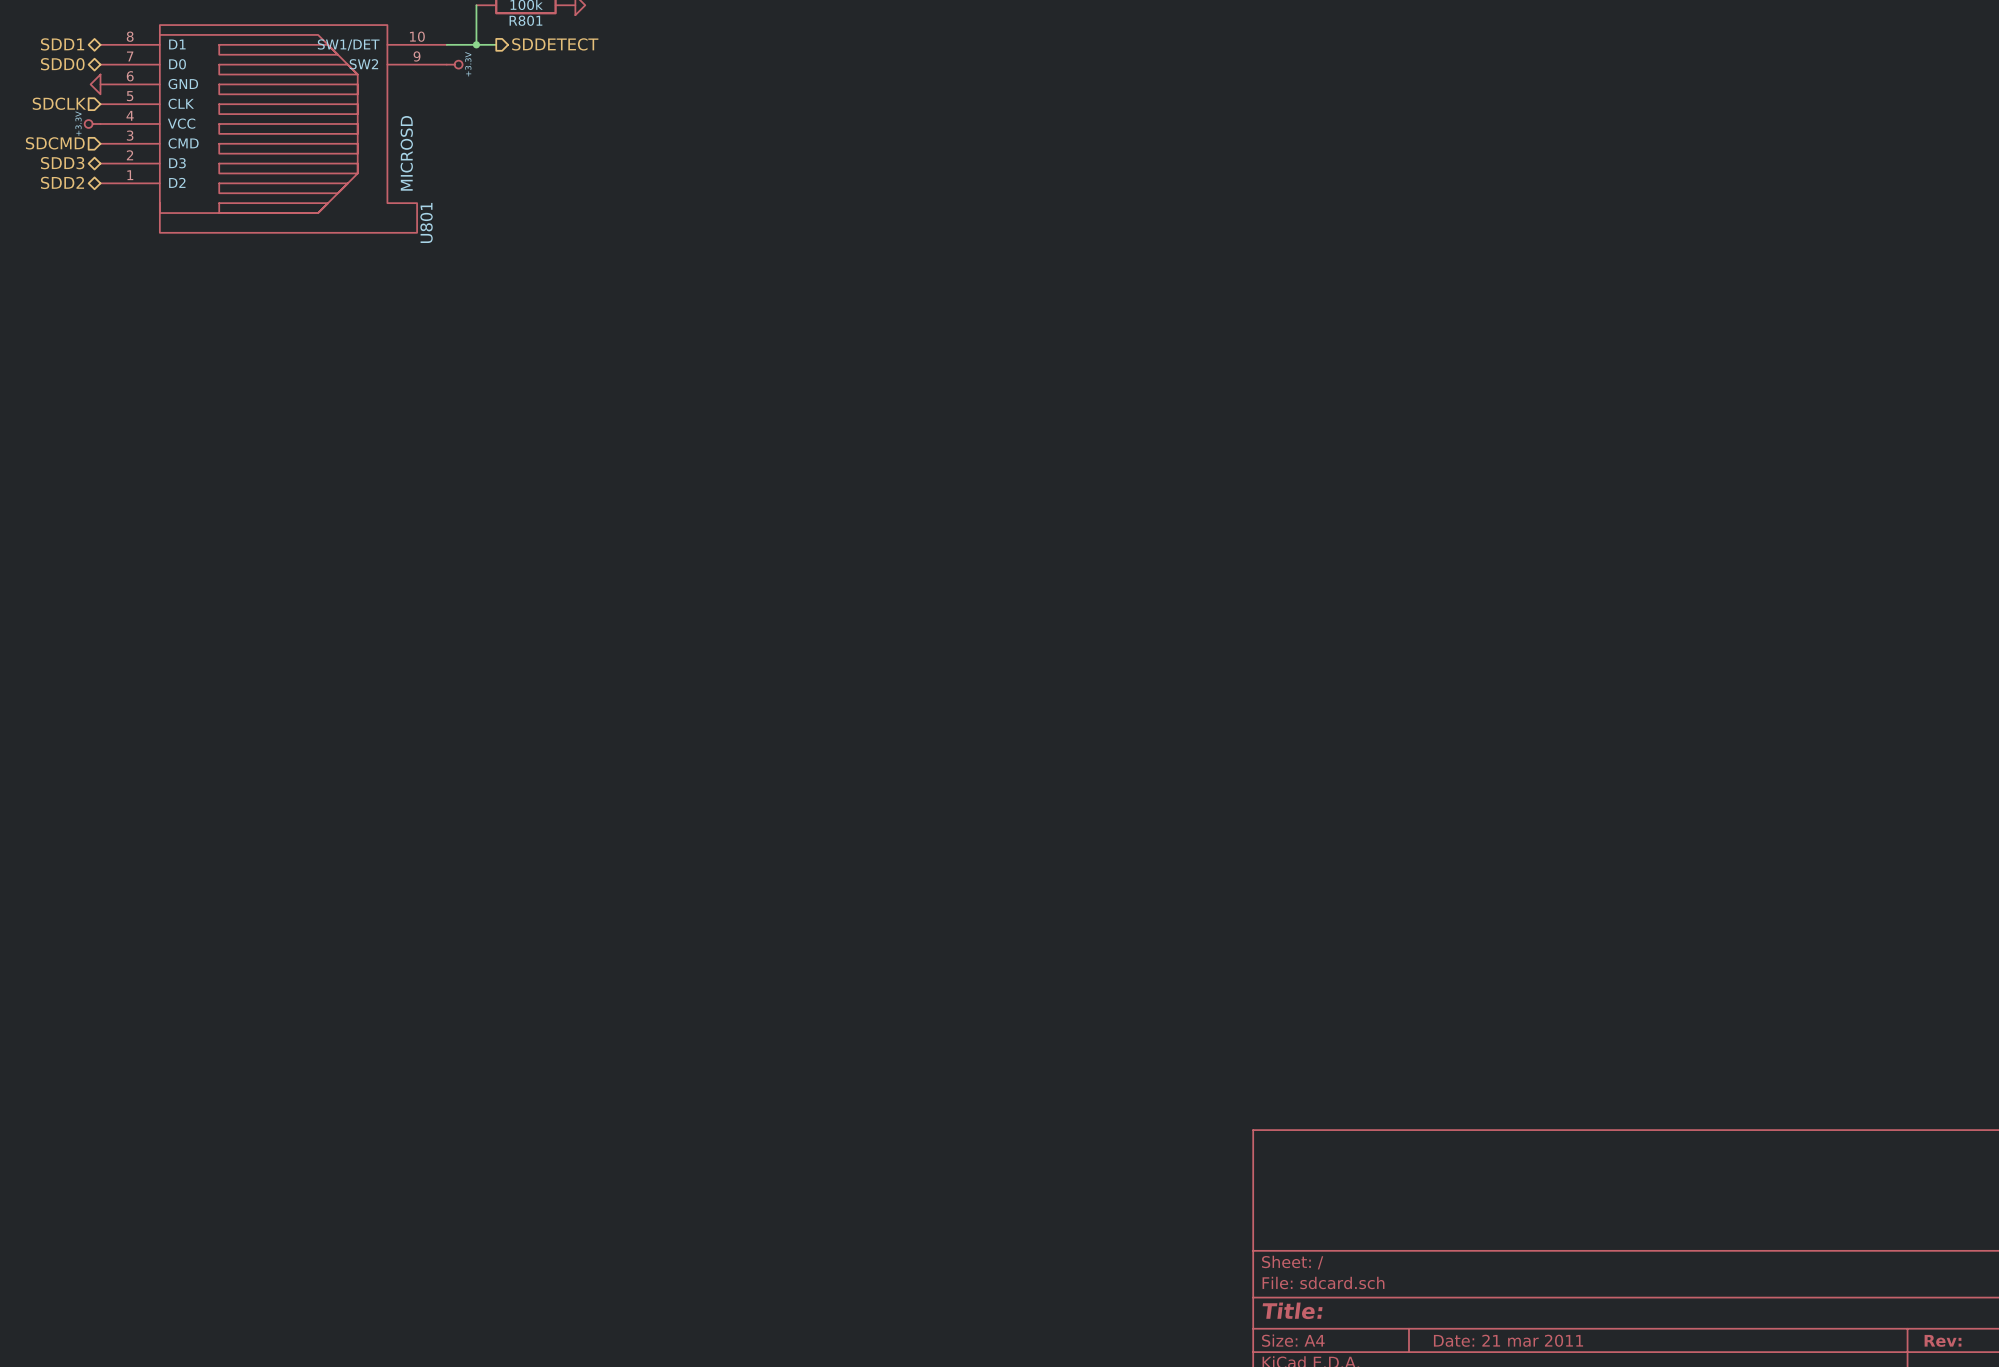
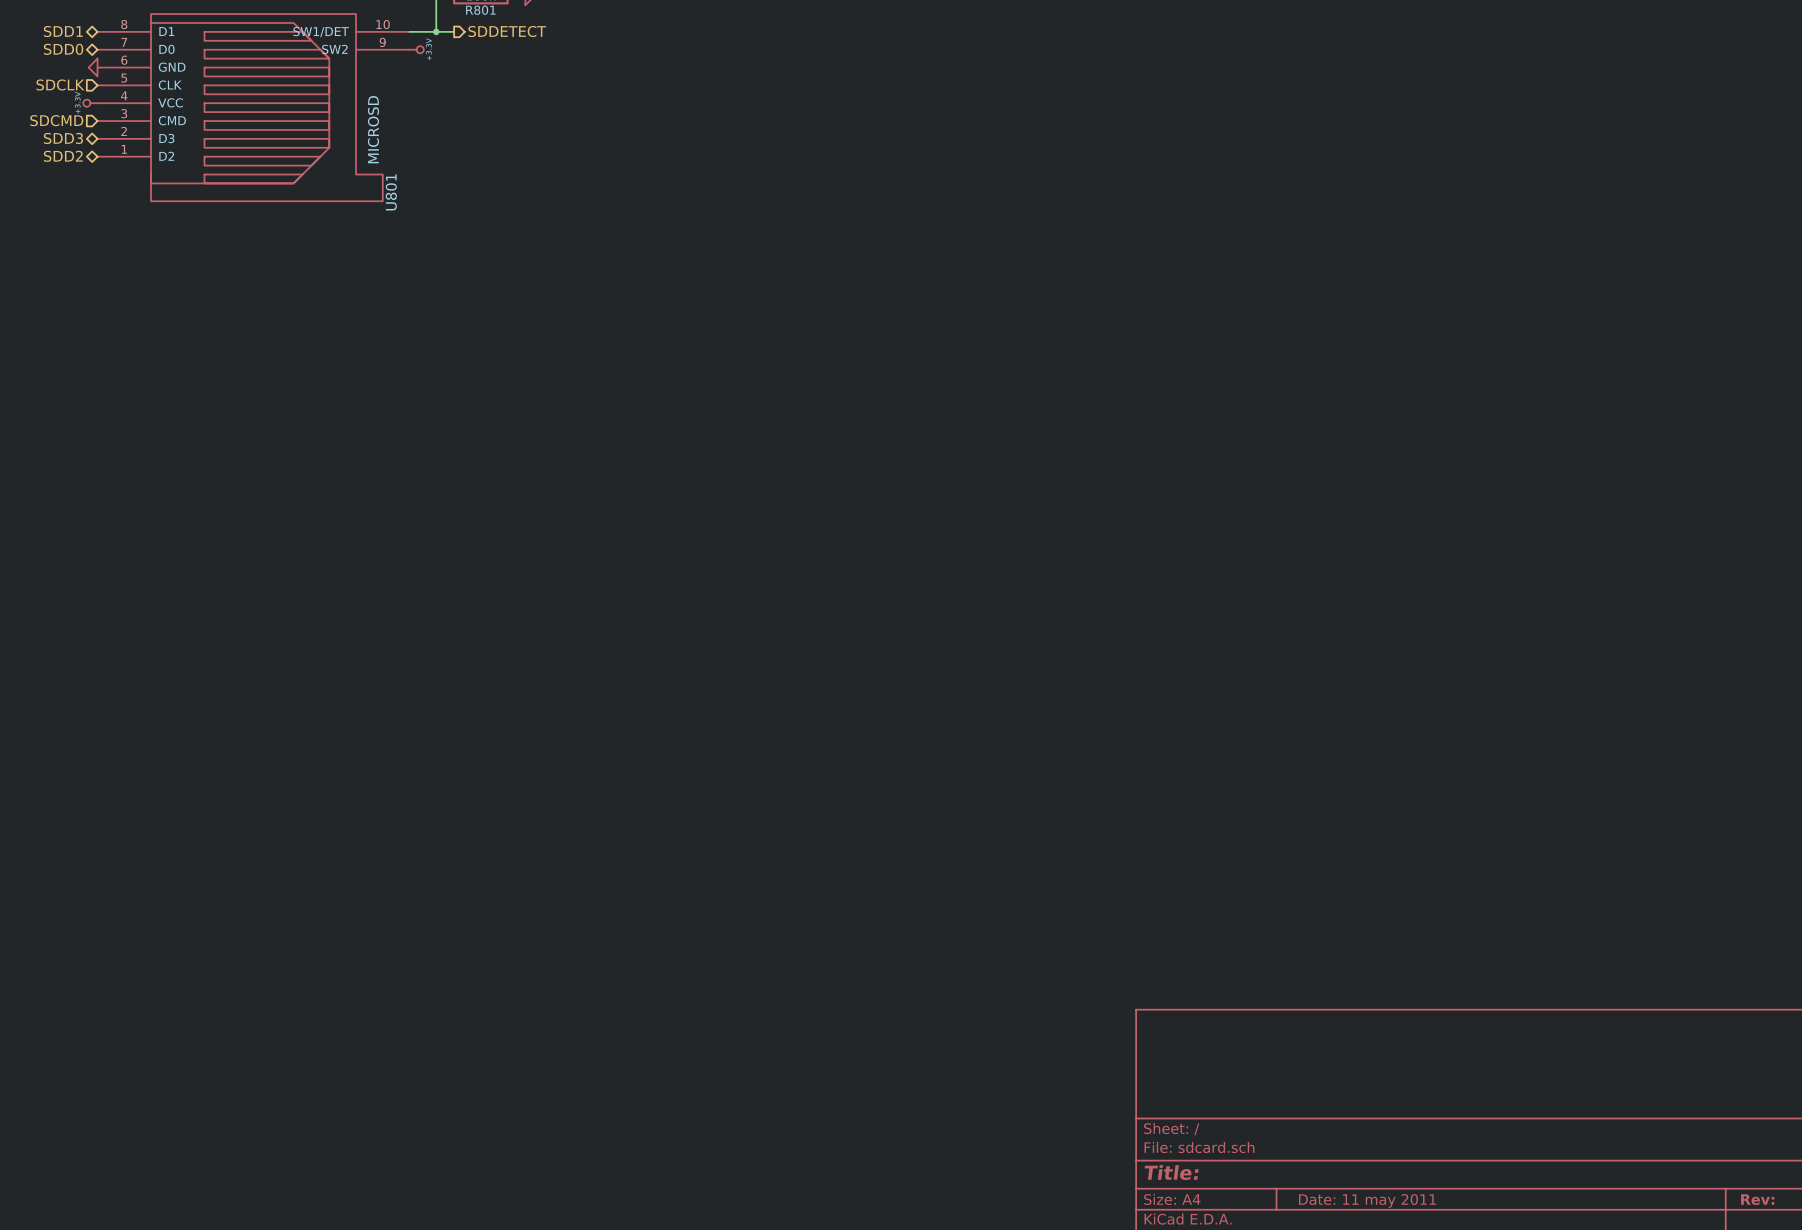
title block: Date: 21 mar 2011 (1508, 1340) -> Date: 11 may 2011 (1367, 1200)

